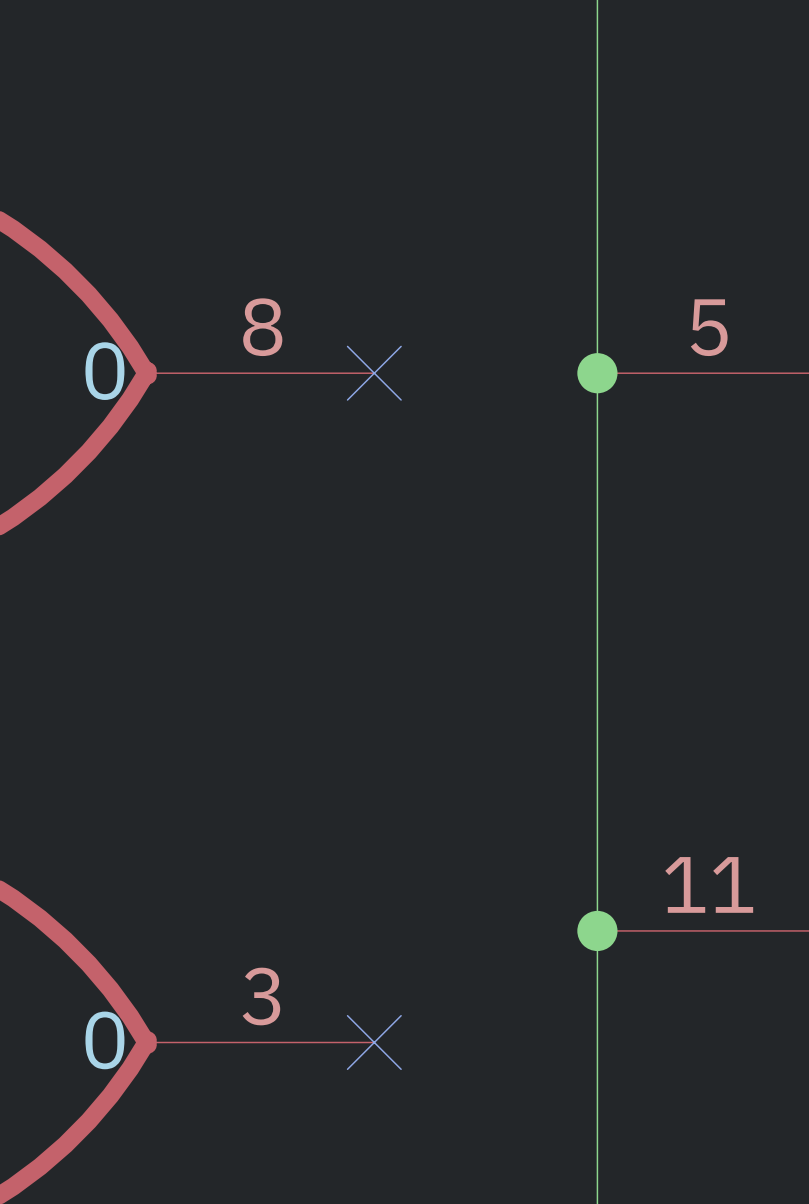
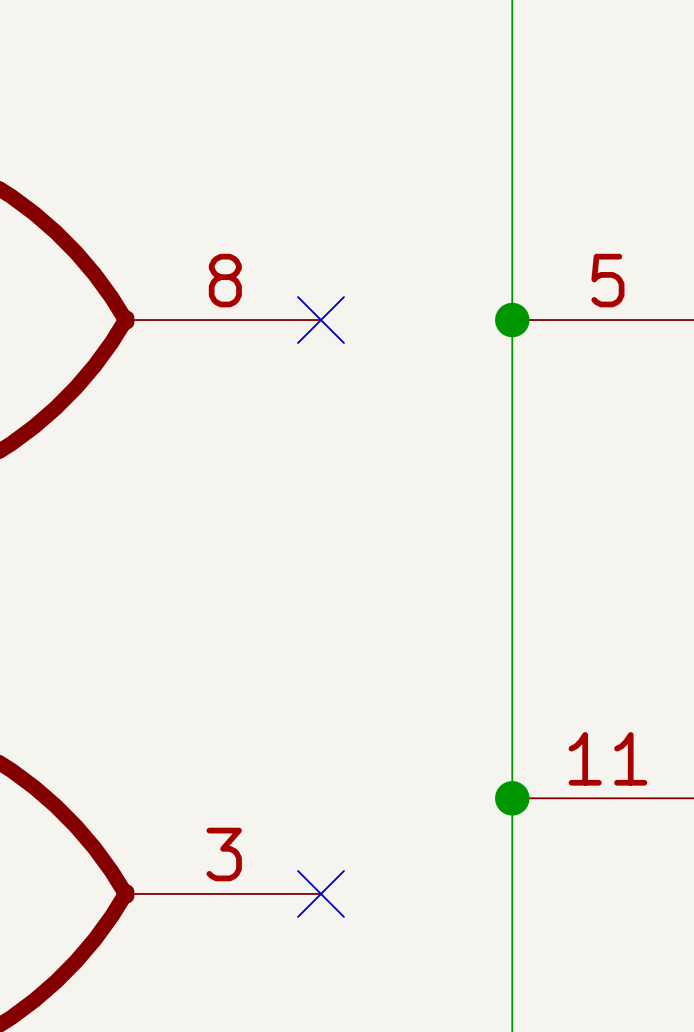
part pin name: O (104, 371) -> none
part pin name: O (104, 1040) -> none

